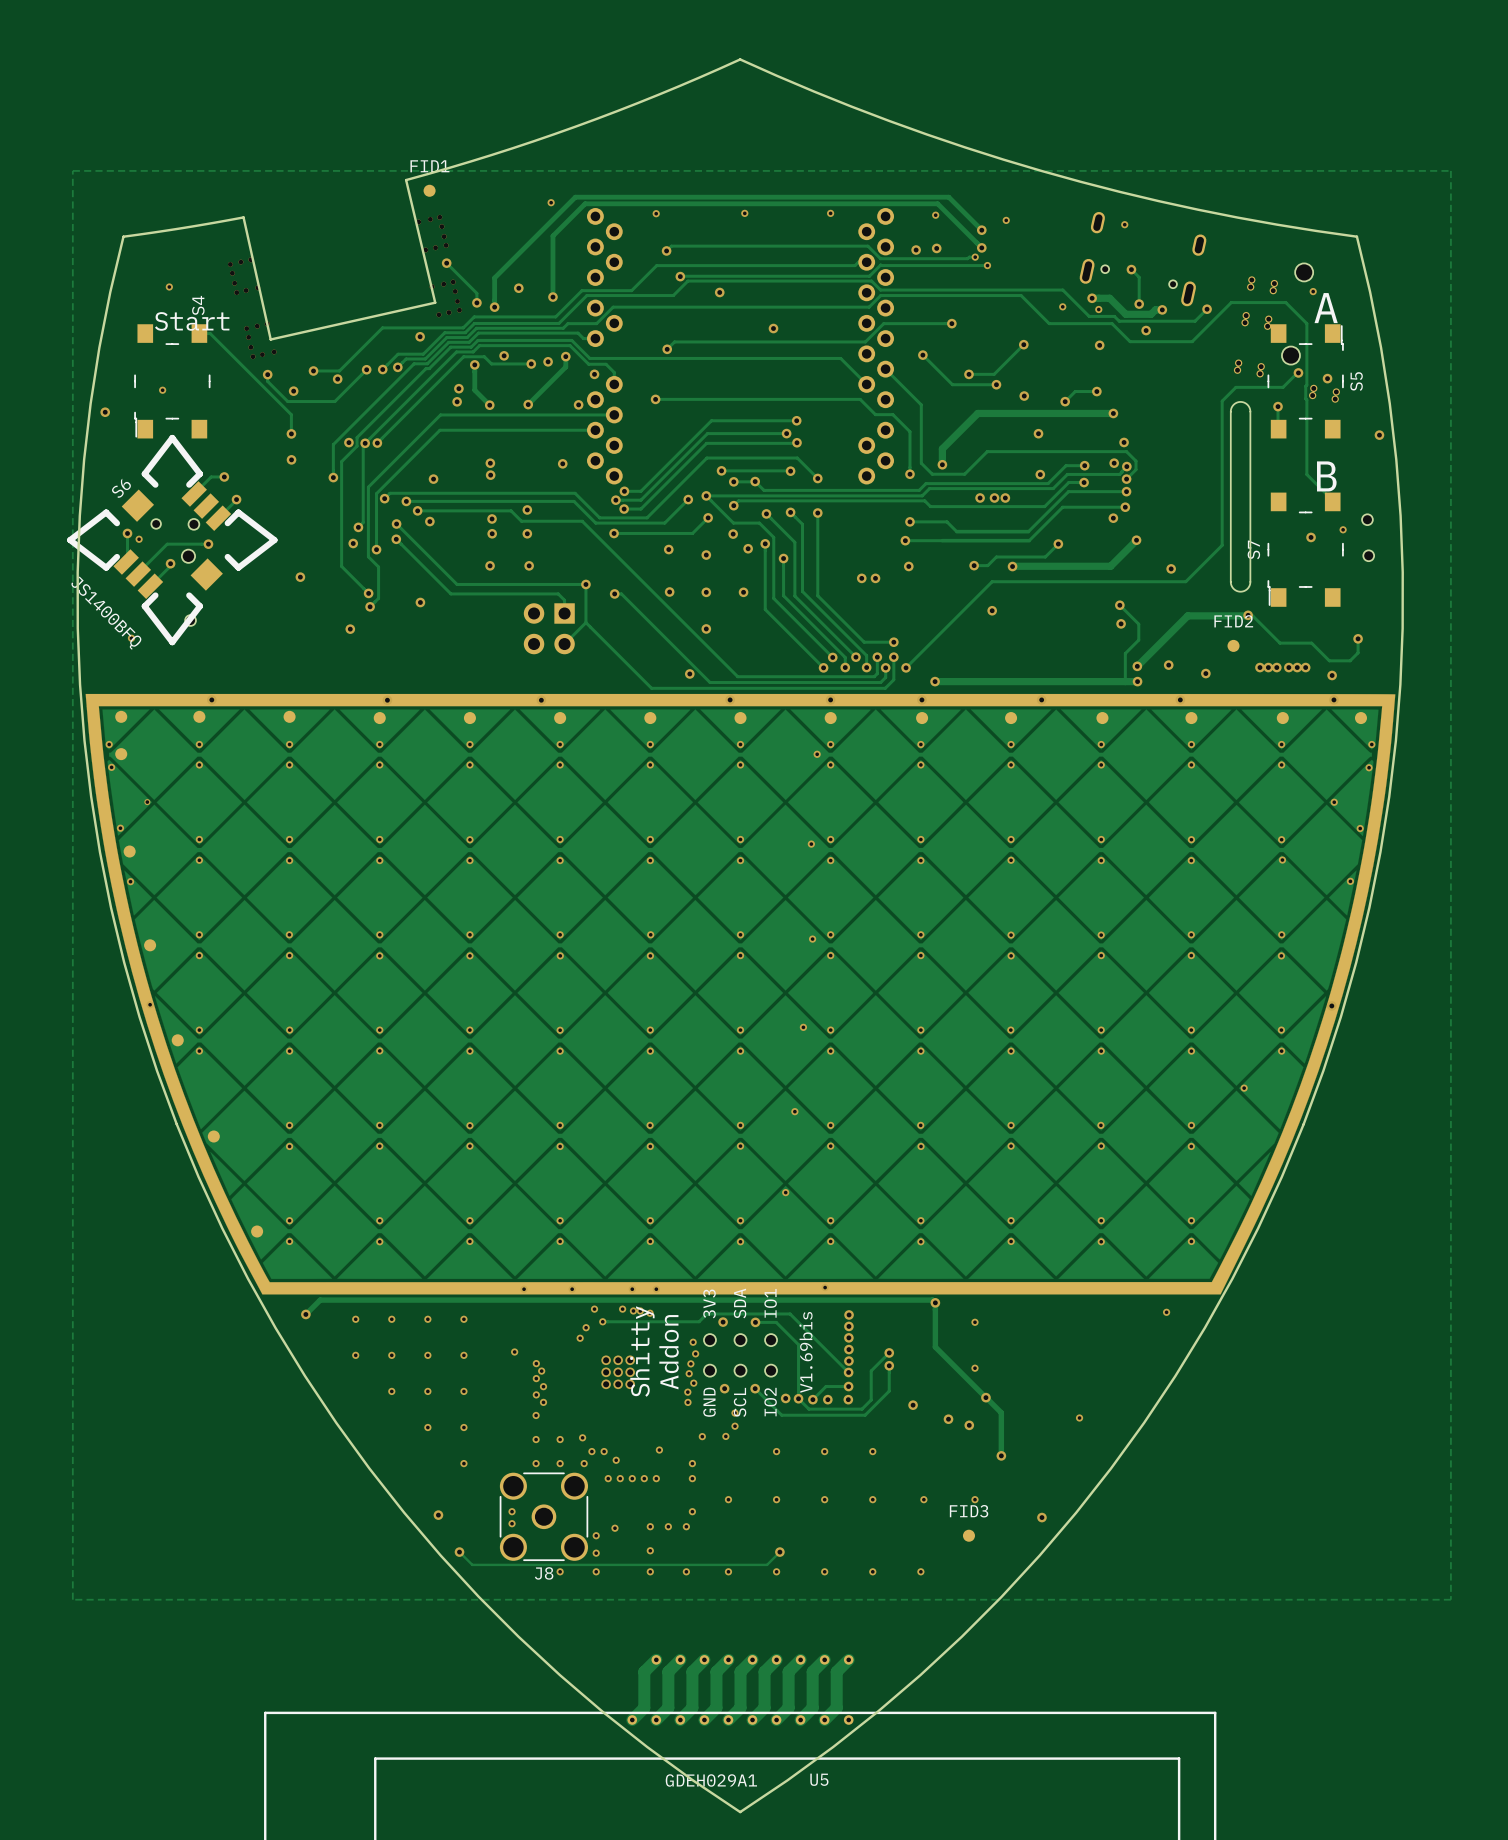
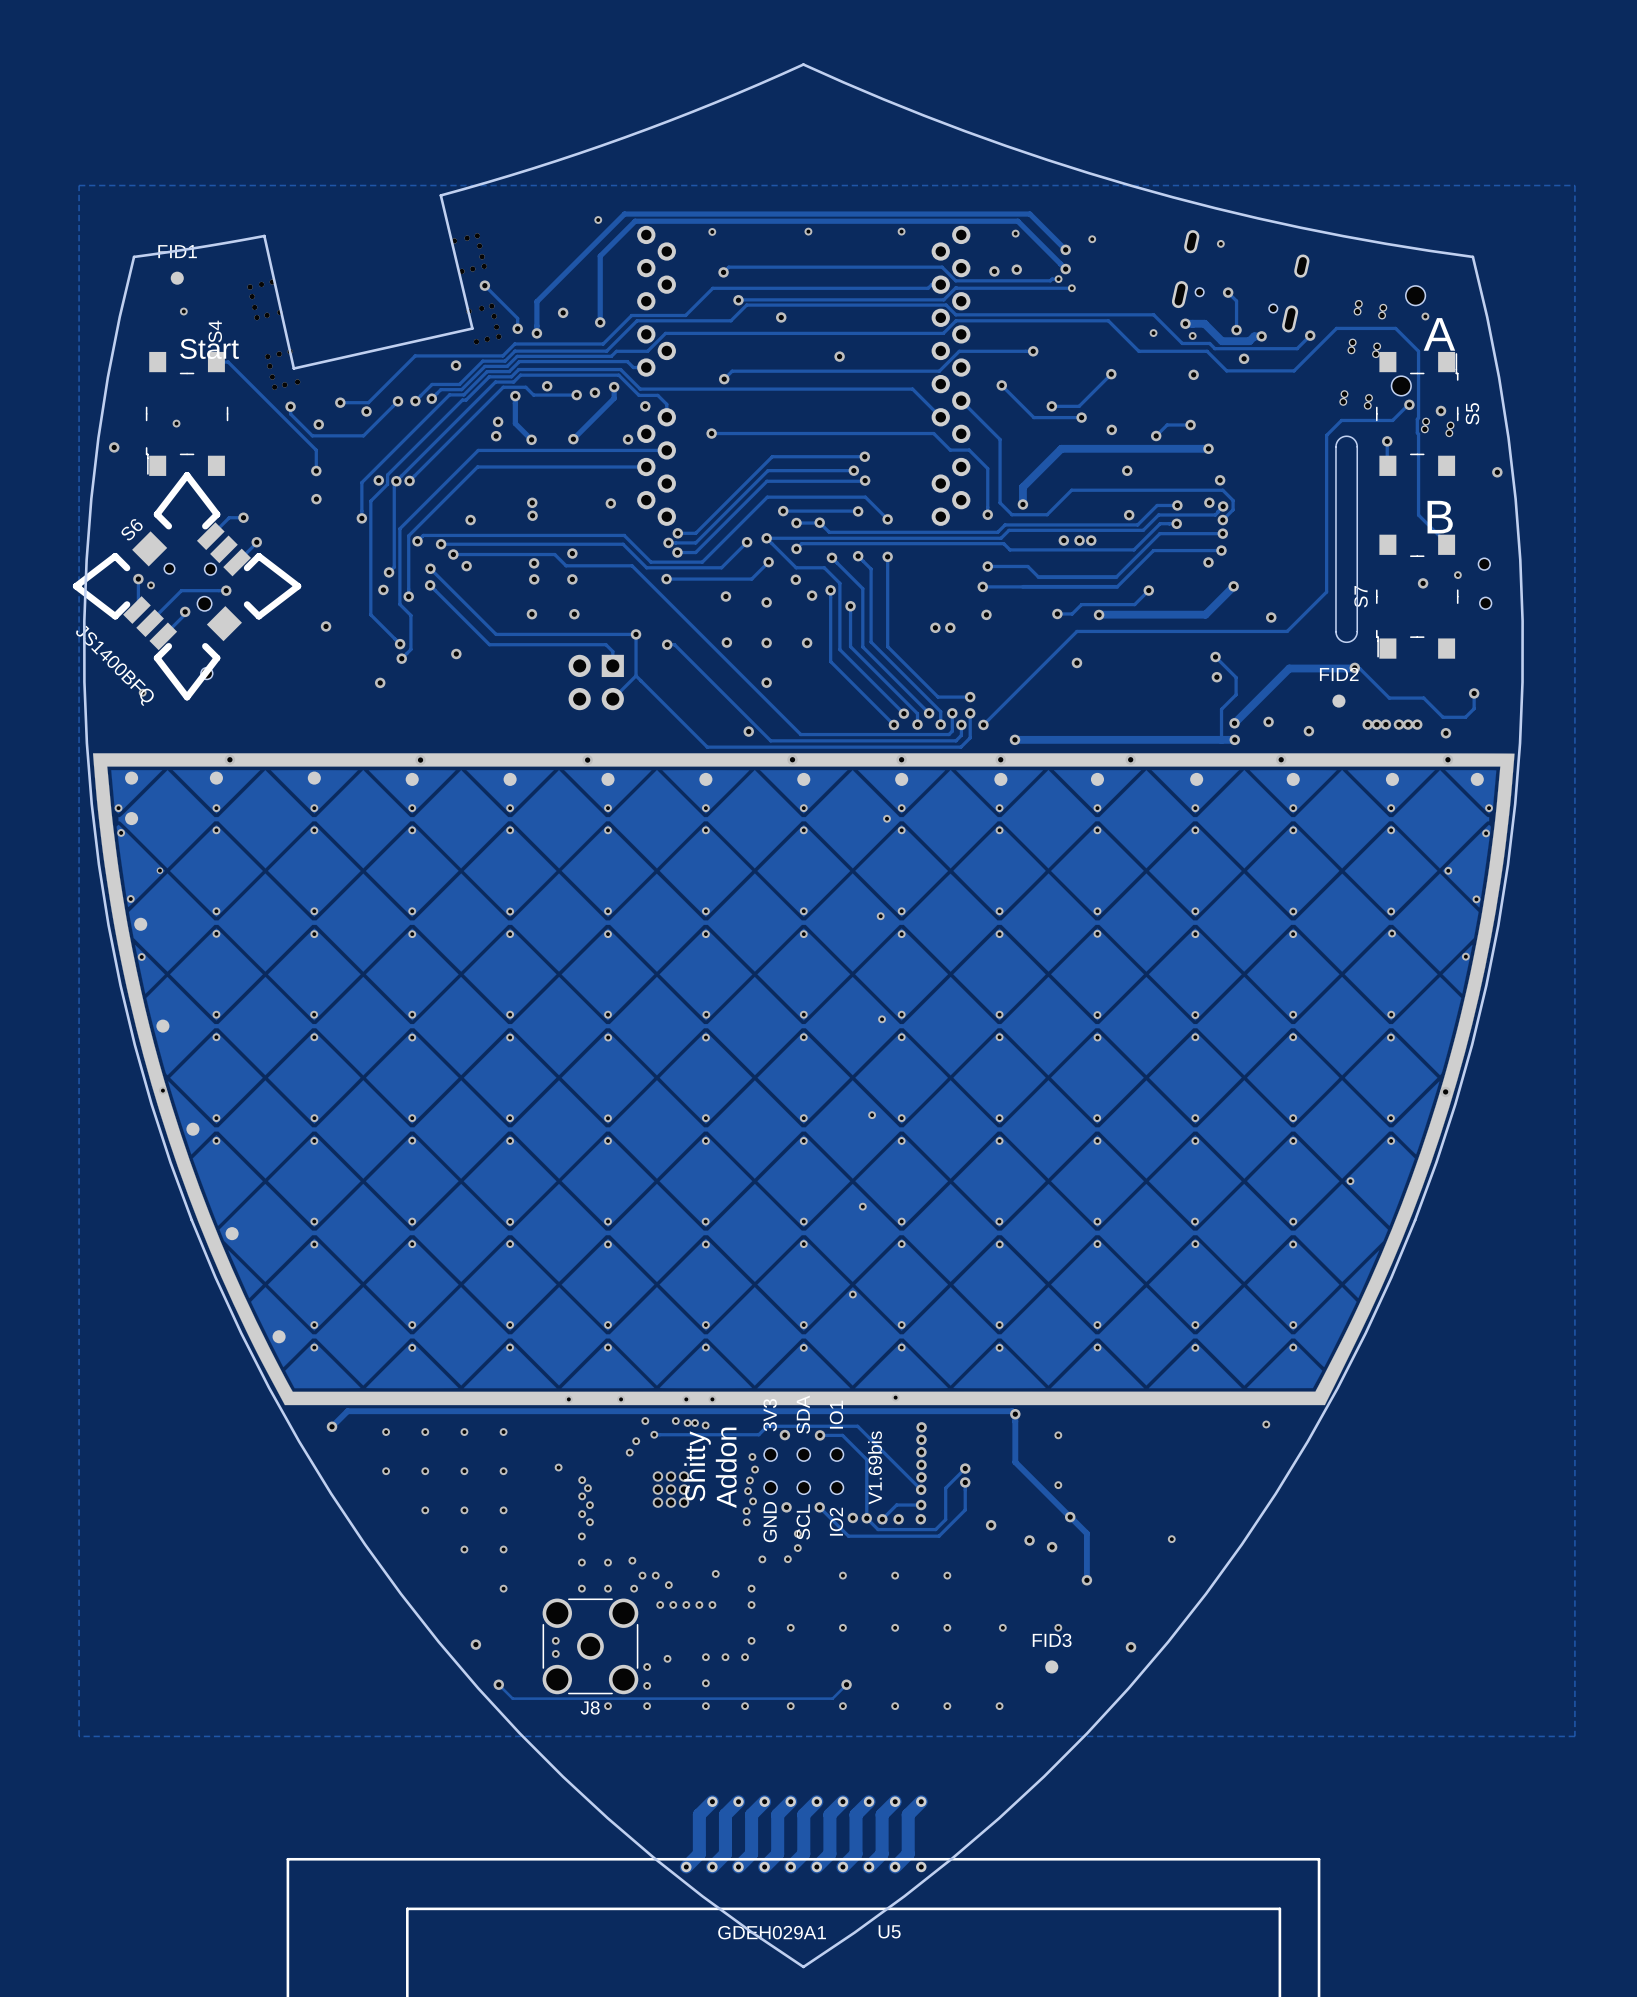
FID1 position: (429, 190) -> (177, 278)

